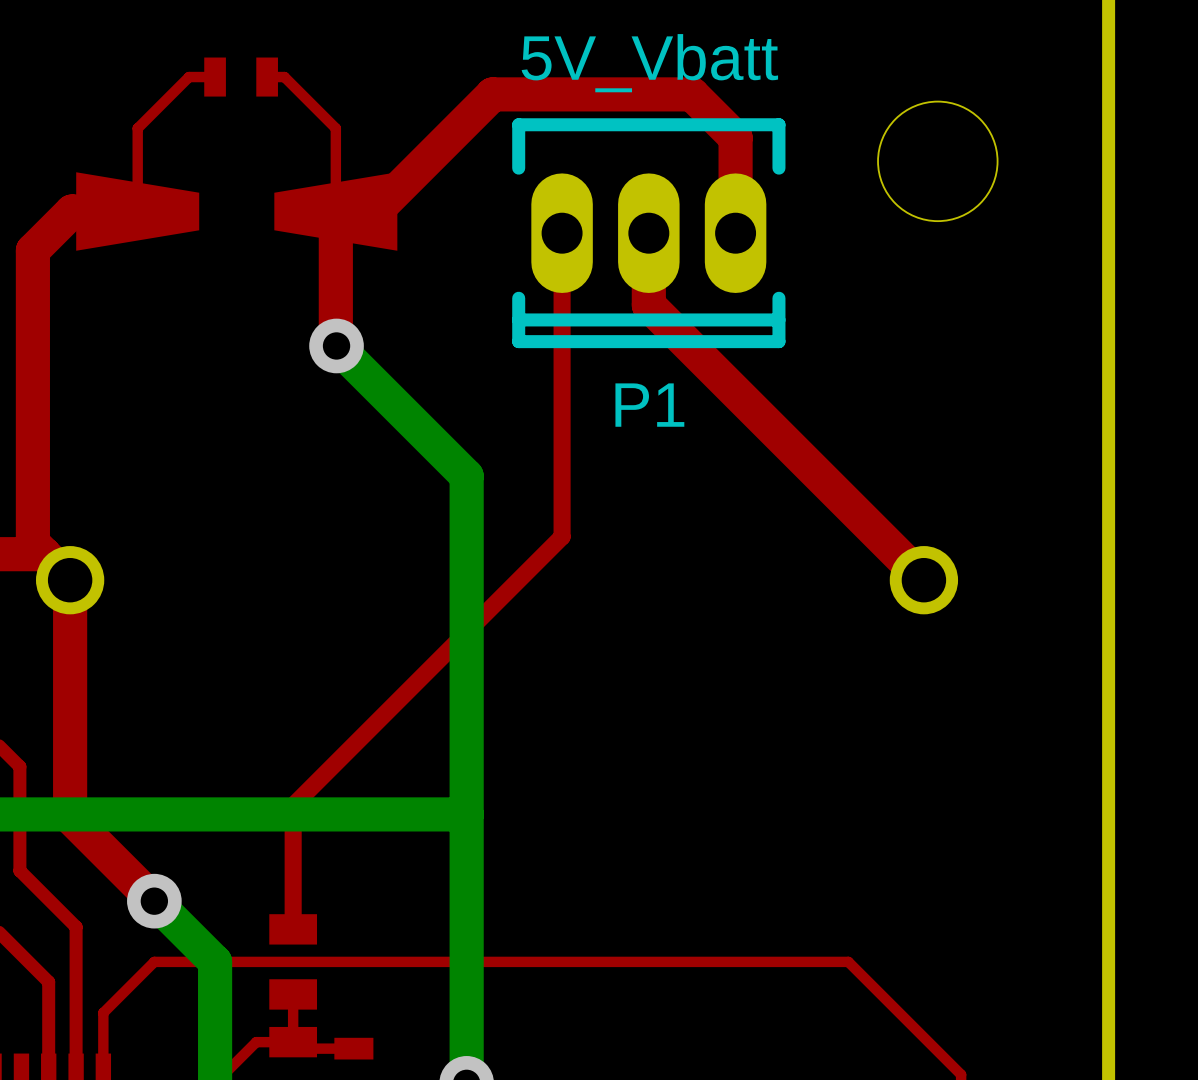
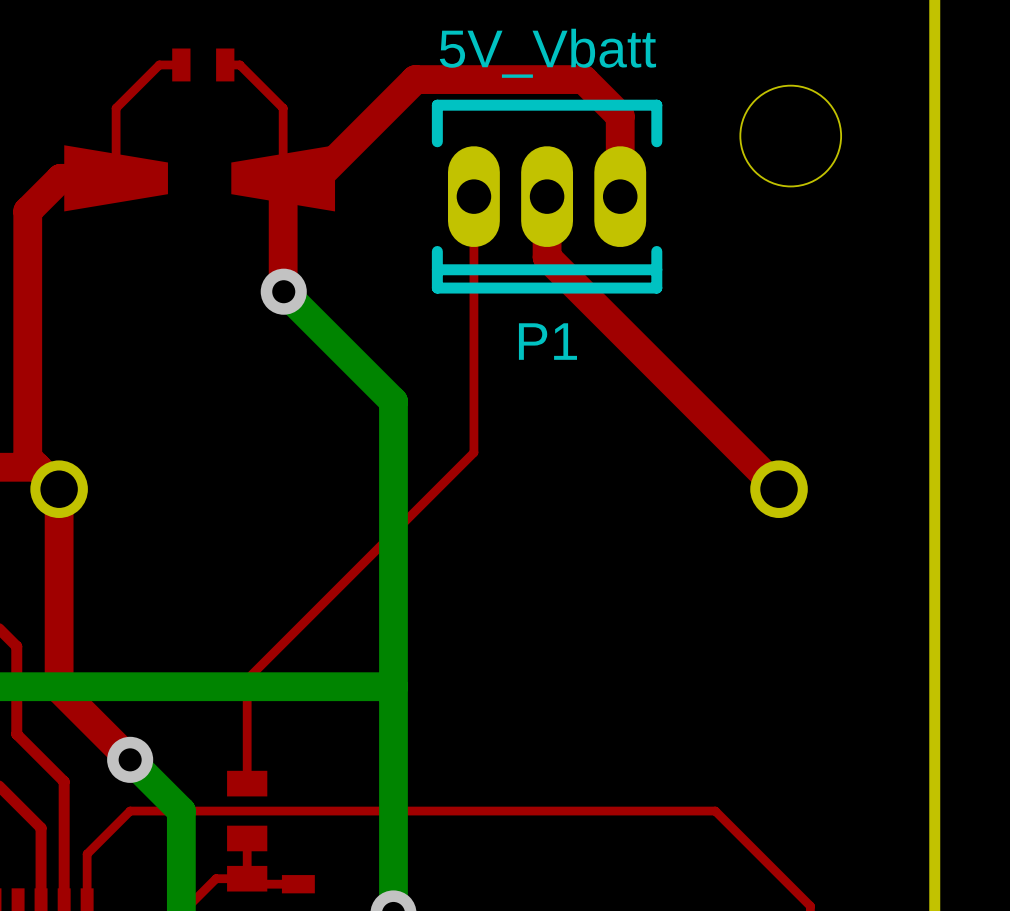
top track width: thick (562, 233) (562, 536) (293, 805) (293, 929) -> thin (473, 196) (473, 452) (247, 679) (247, 783)

